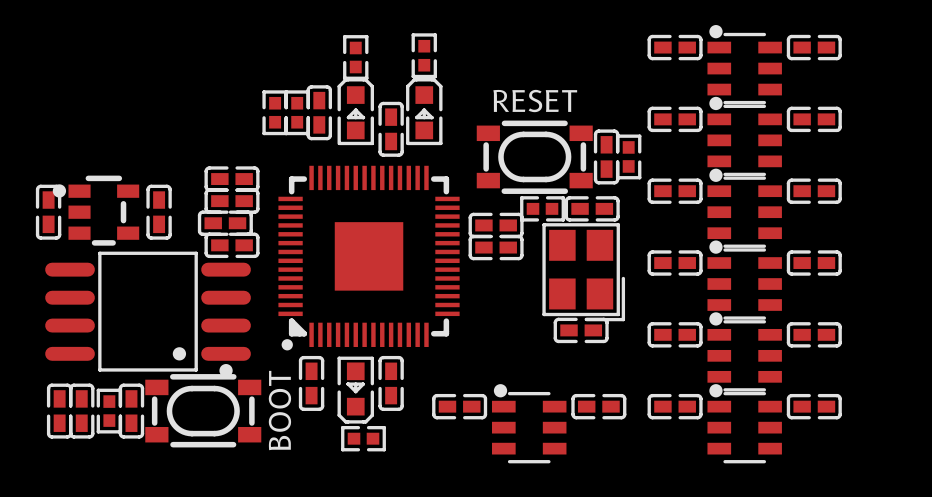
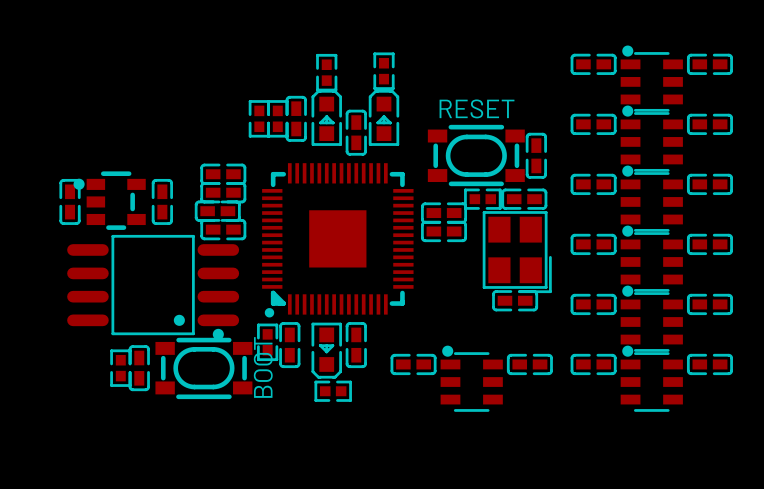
part position: (628, 156) -> (267, 342)
part rotation: 0° (534, 157) -> 180° (476, 155)
part rotation: 0° (203, 410) -> 180° (203, 368)
part: (59, 411) -> none
part: (81, 411) -> none

